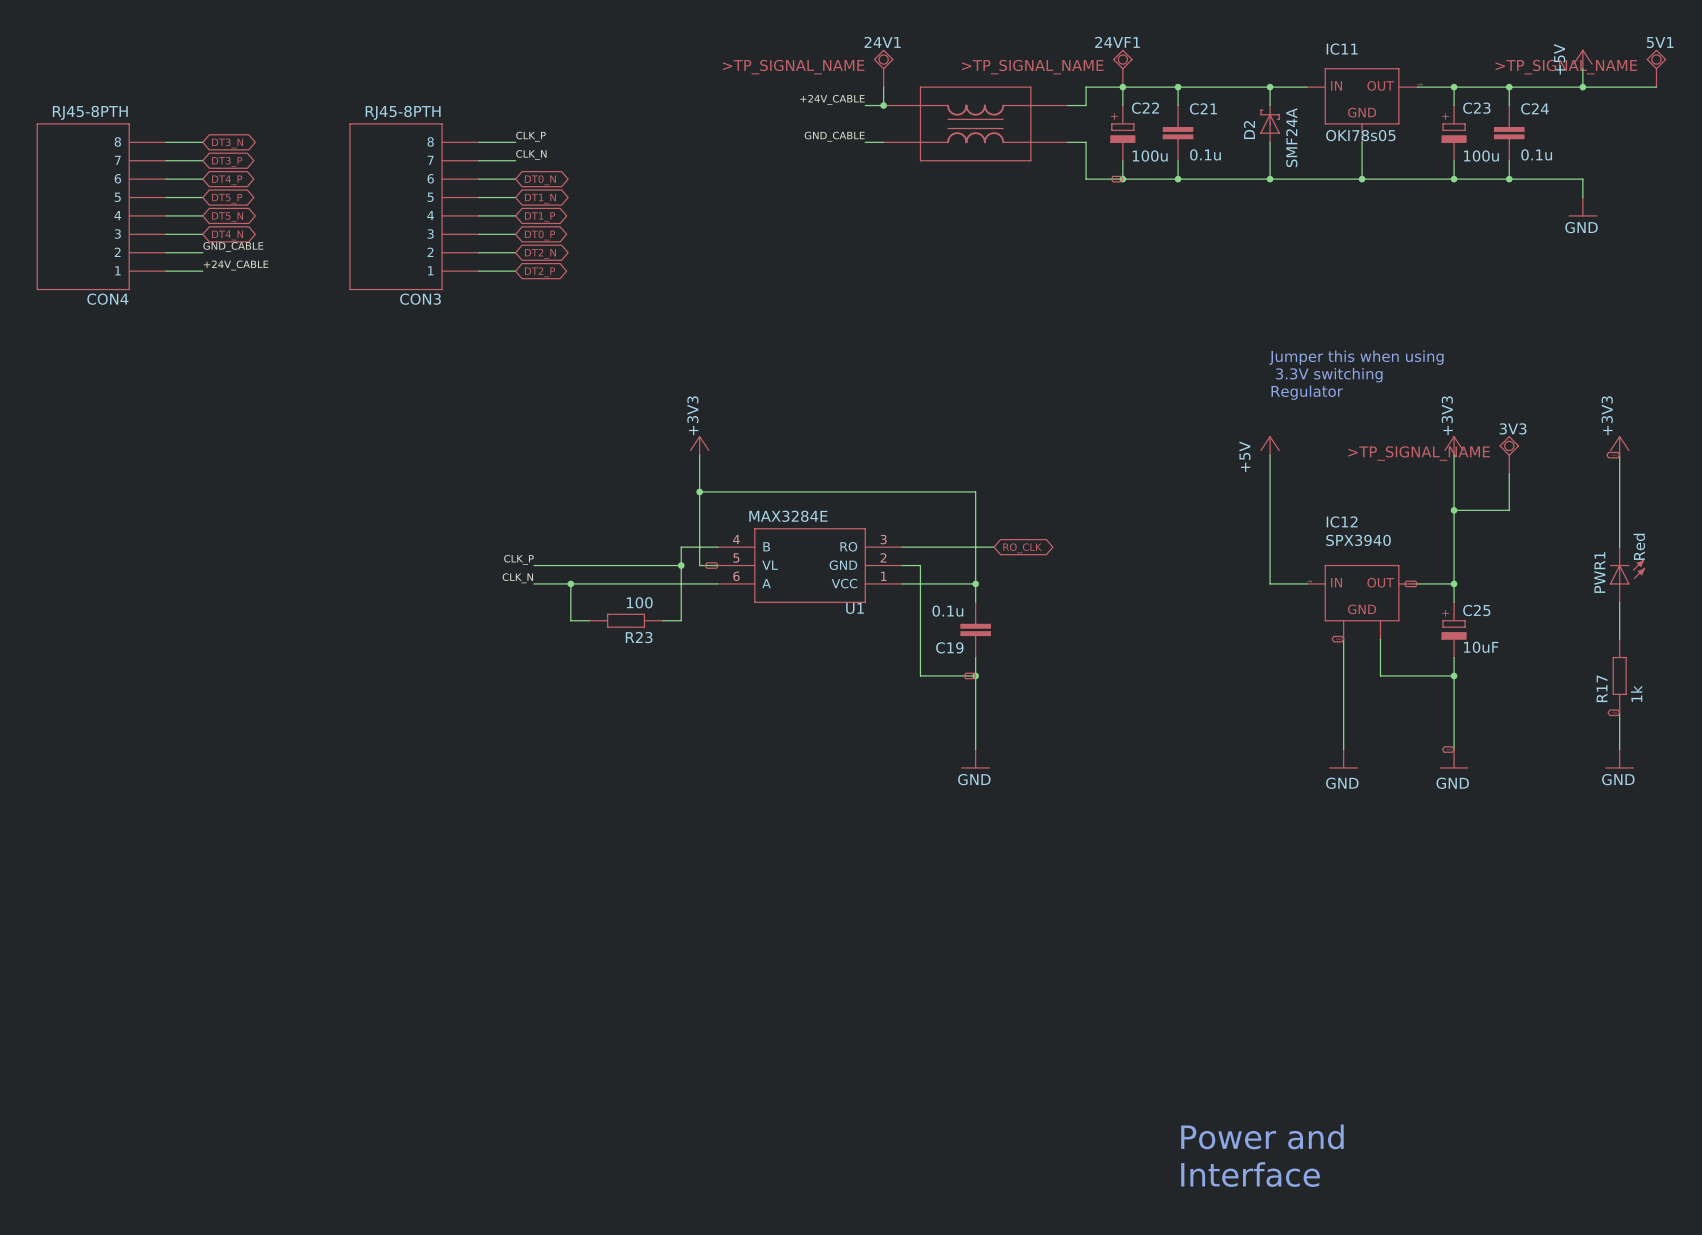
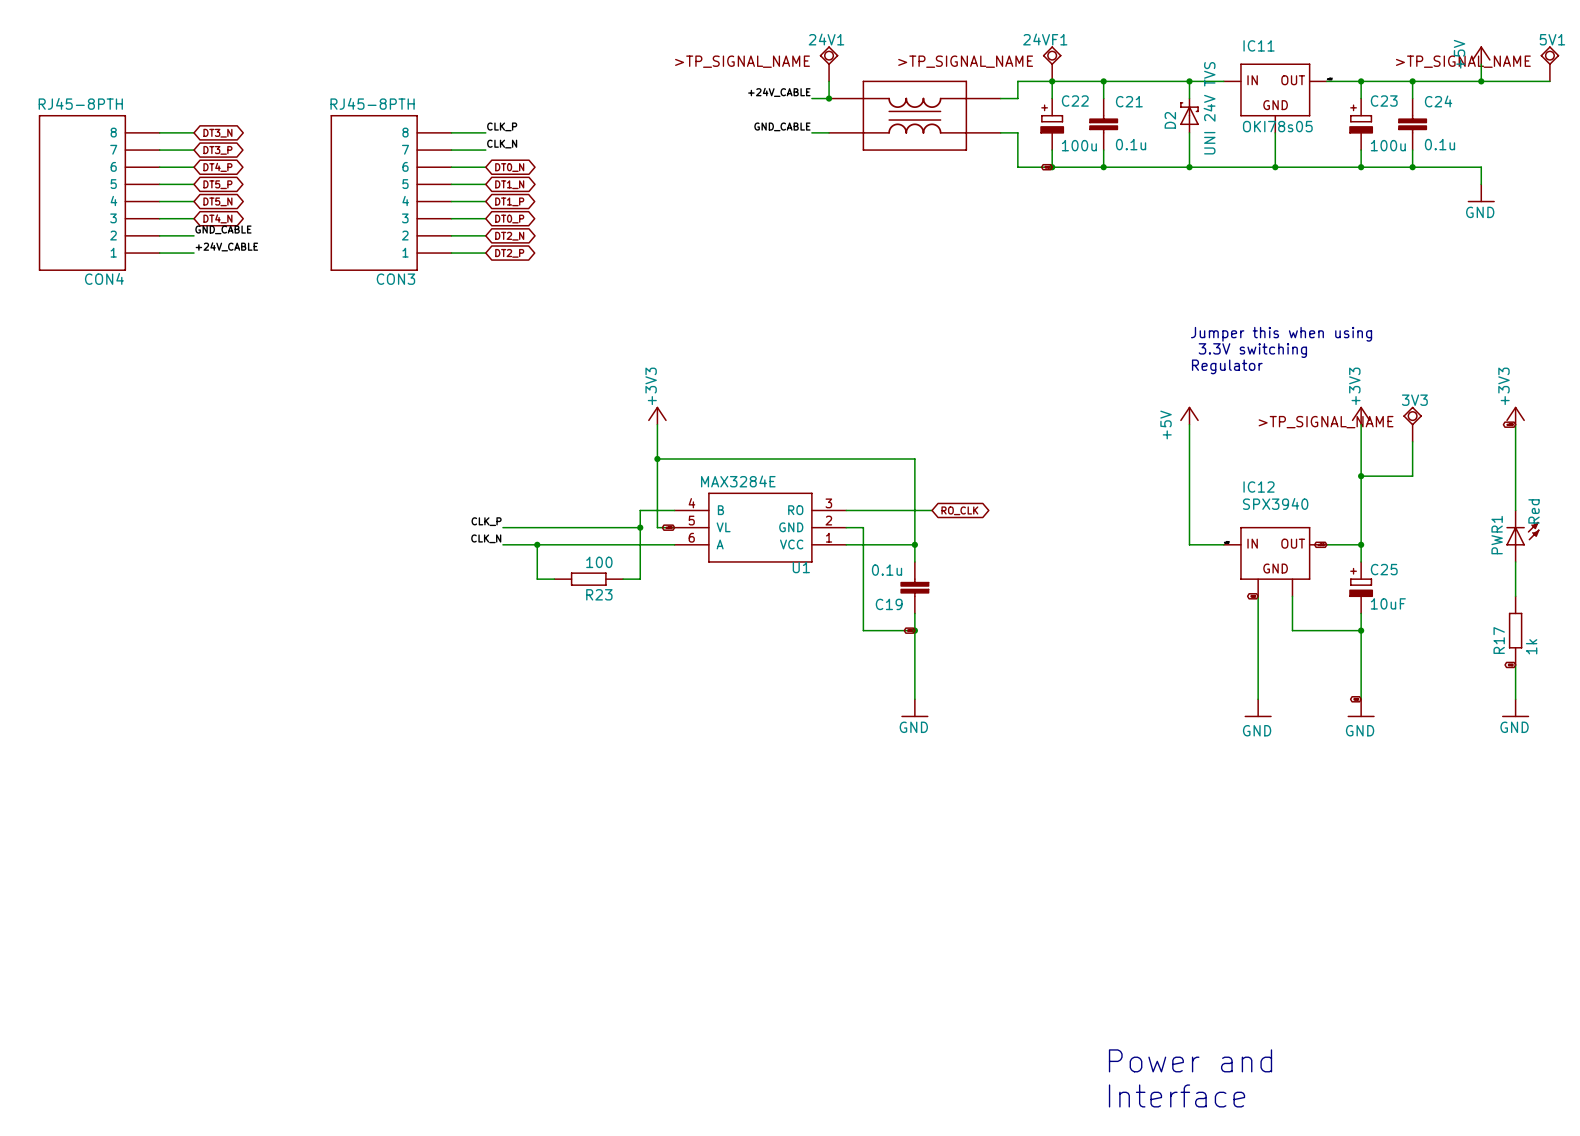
D2 value: SMF24A (1291, 137) -> UNI 24V TVS (1209, 108)

